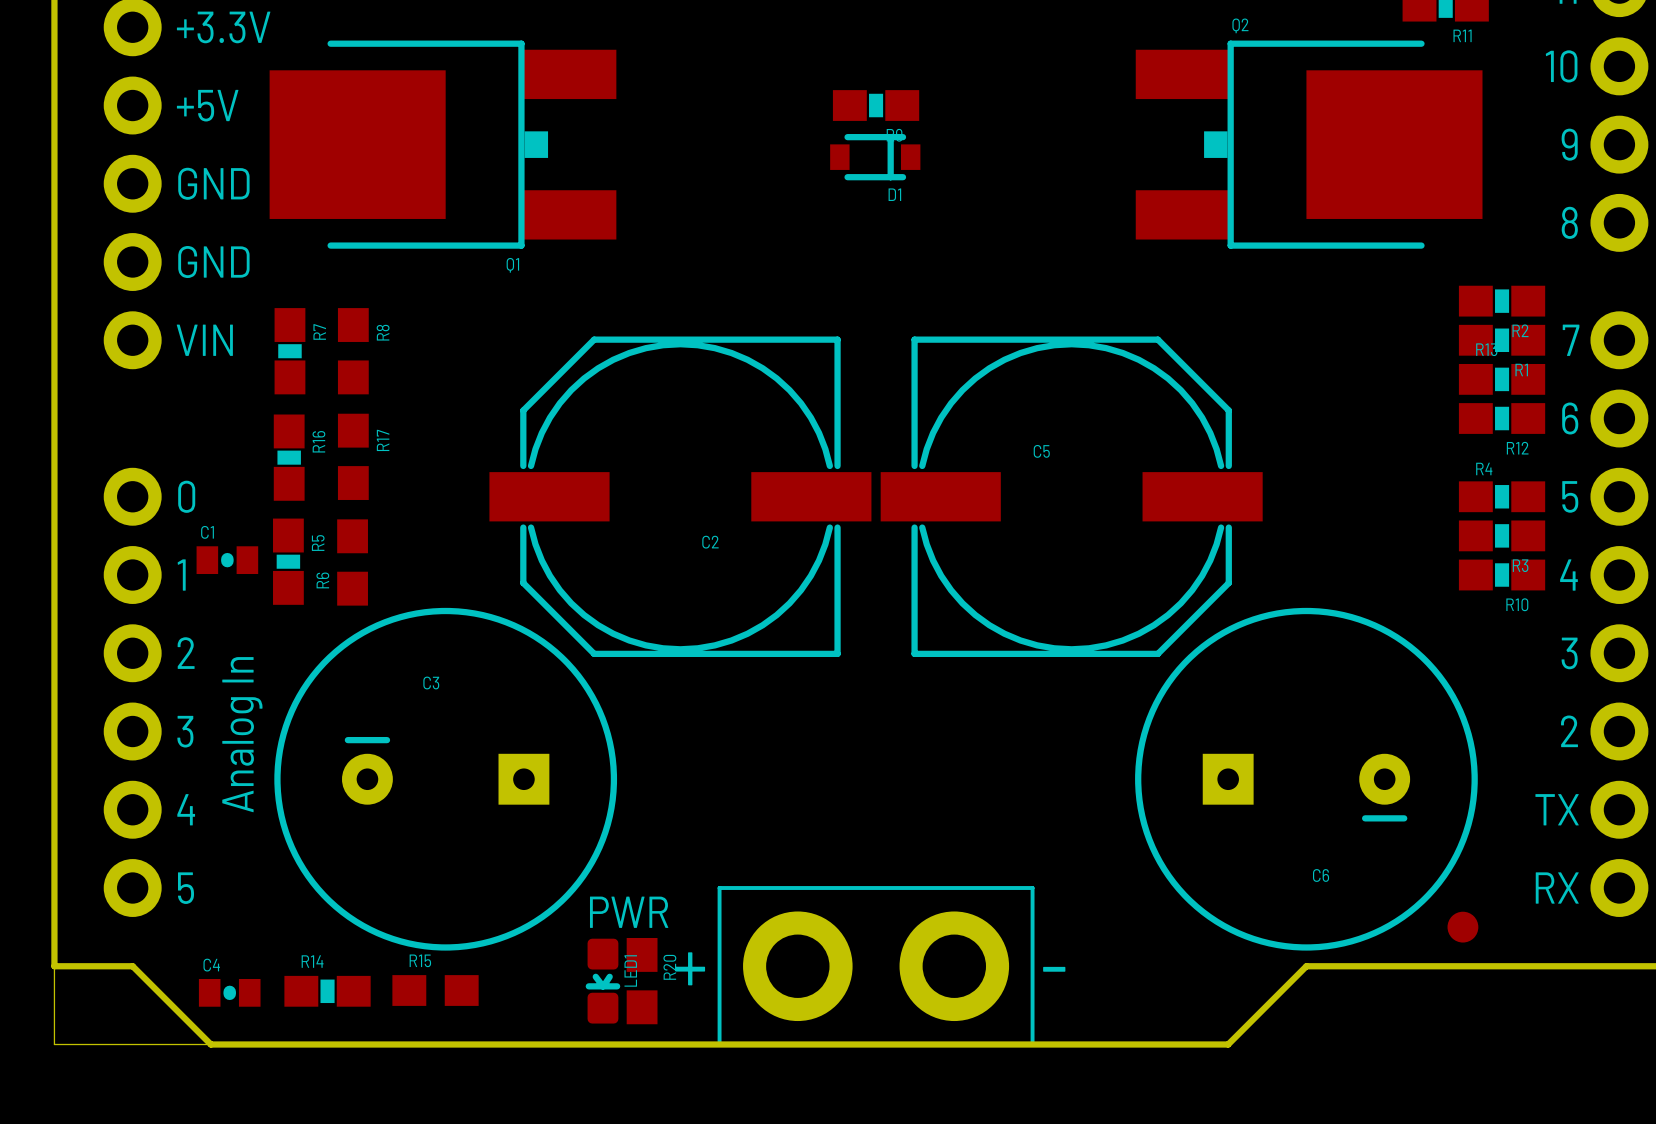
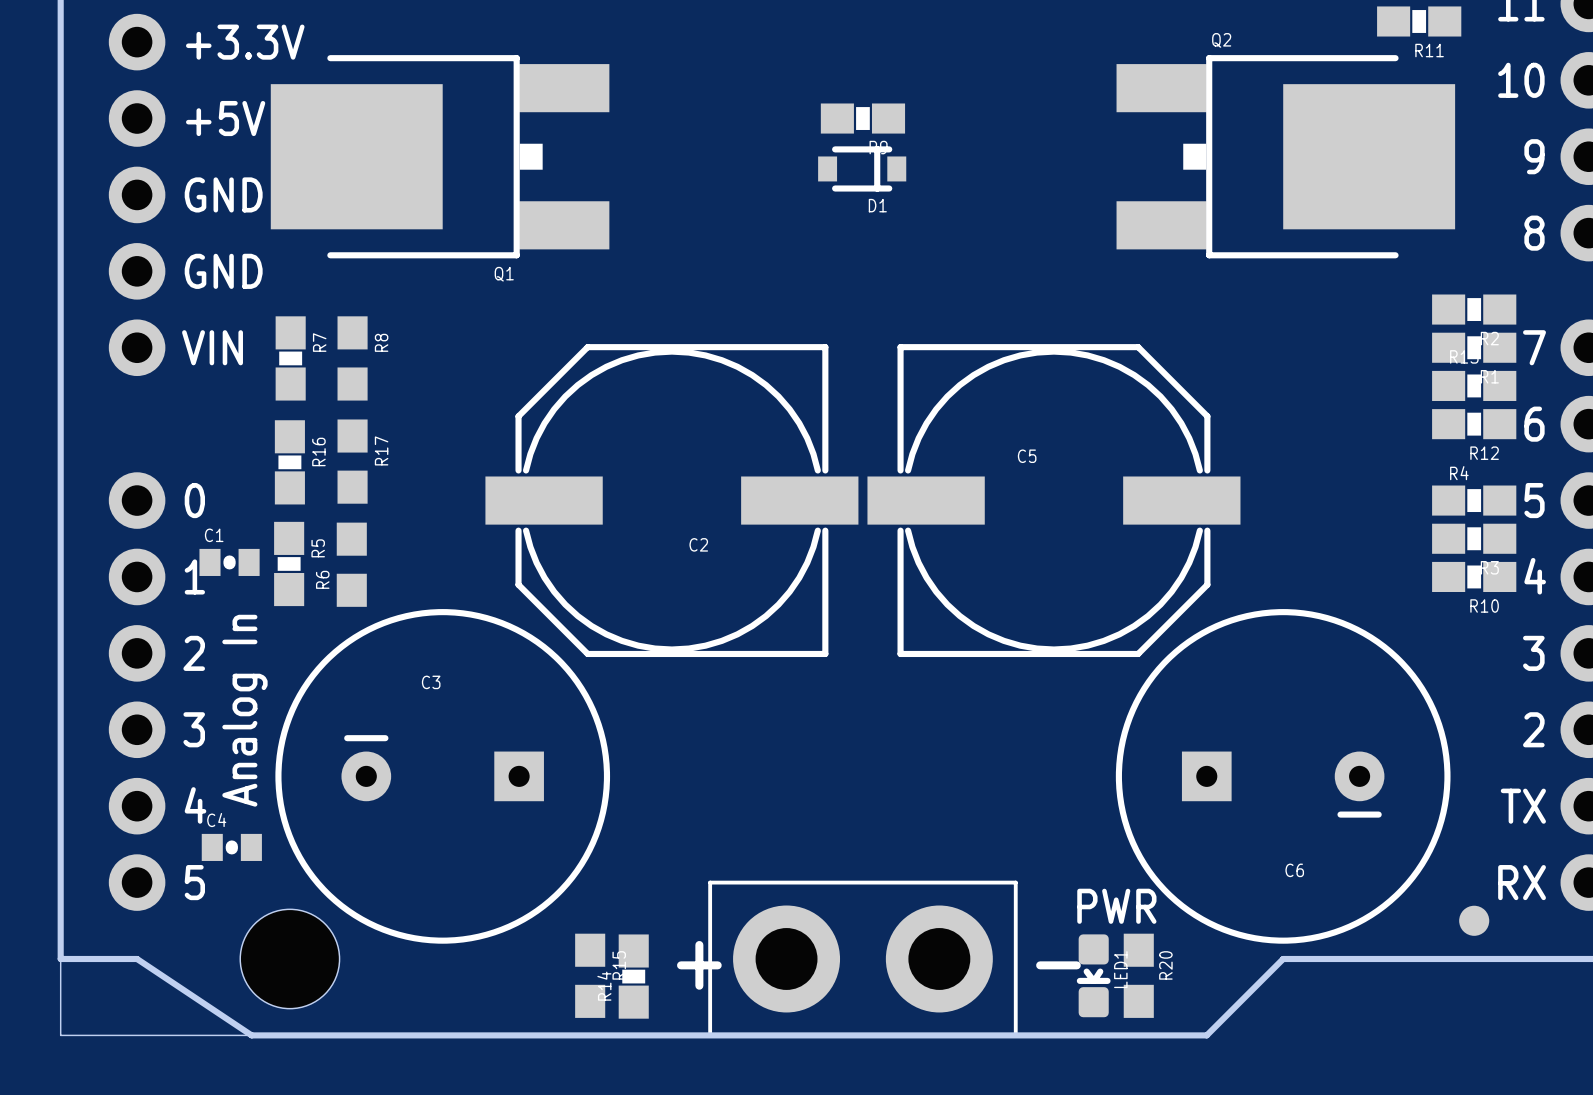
text position: PWR (629, 912) -> PWR (1116, 906)
part position: (1462, 927) -> (1474, 920)
board edge: (132, 966) (210, 1044) -> (137, 958) (251, 1035)
part: none -> (289, 958)
LED1 position: (602, 981) -> (1093, 975)
R20 position: (642, 981) -> (1138, 975)
R15 rotation: 0° (435, 990) -> 90° clockwise (590, 975)
R15 position: (435, 990) -> (590, 975)
R14 rotation: 0° (327, 991) -> 90° clockwise (633, 976)
R14 position: (327, 991) -> (633, 976)
C4 position: (229, 992) -> (231, 847)
board edge width: thick (210, 1044) (250, 1044) -> thin (213, 1035) (251, 1035)

